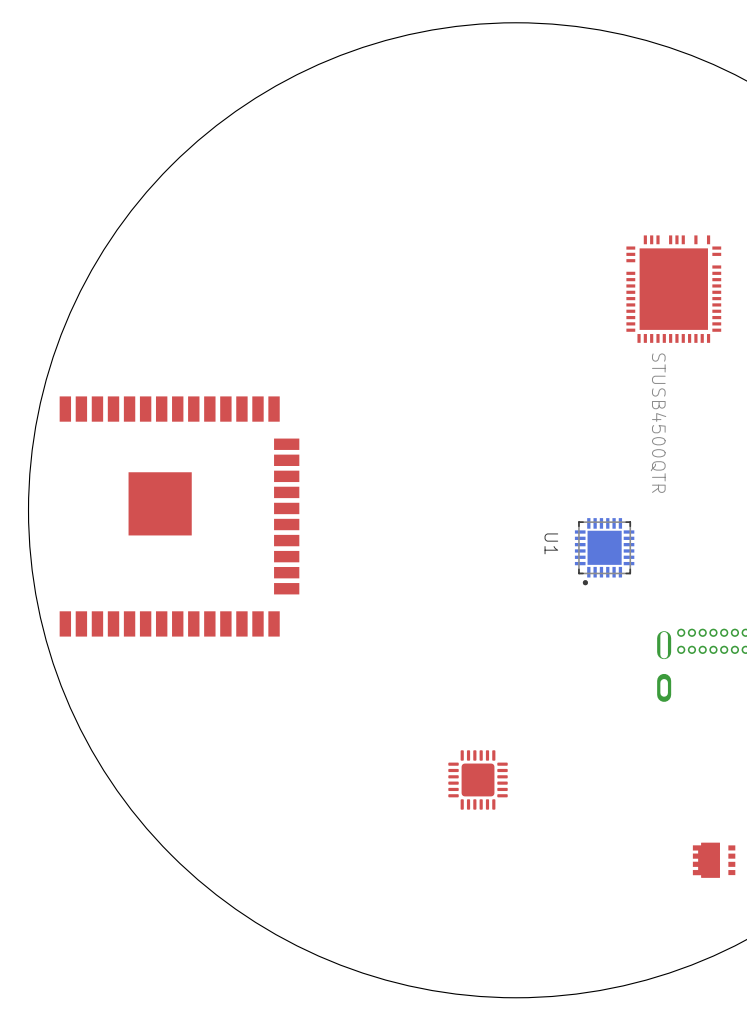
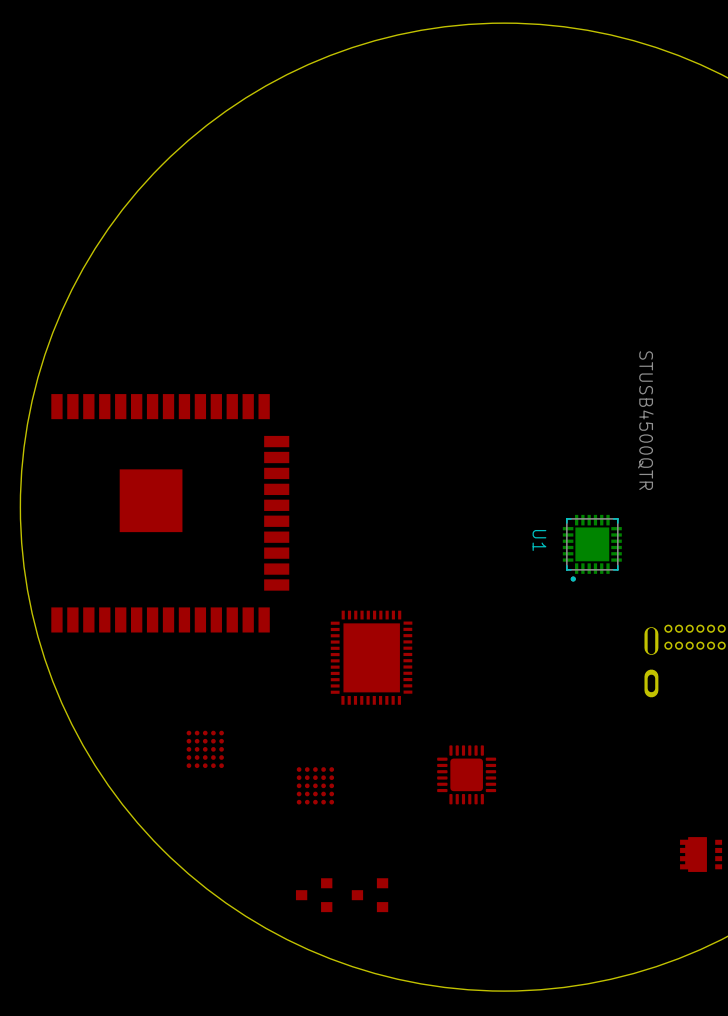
part: (673, 289) -> none
part: none -> (371, 657)
part: none -> (205, 749)
part: none -> (315, 785)
part: none -> (314, 895)
part: none -> (370, 895)

